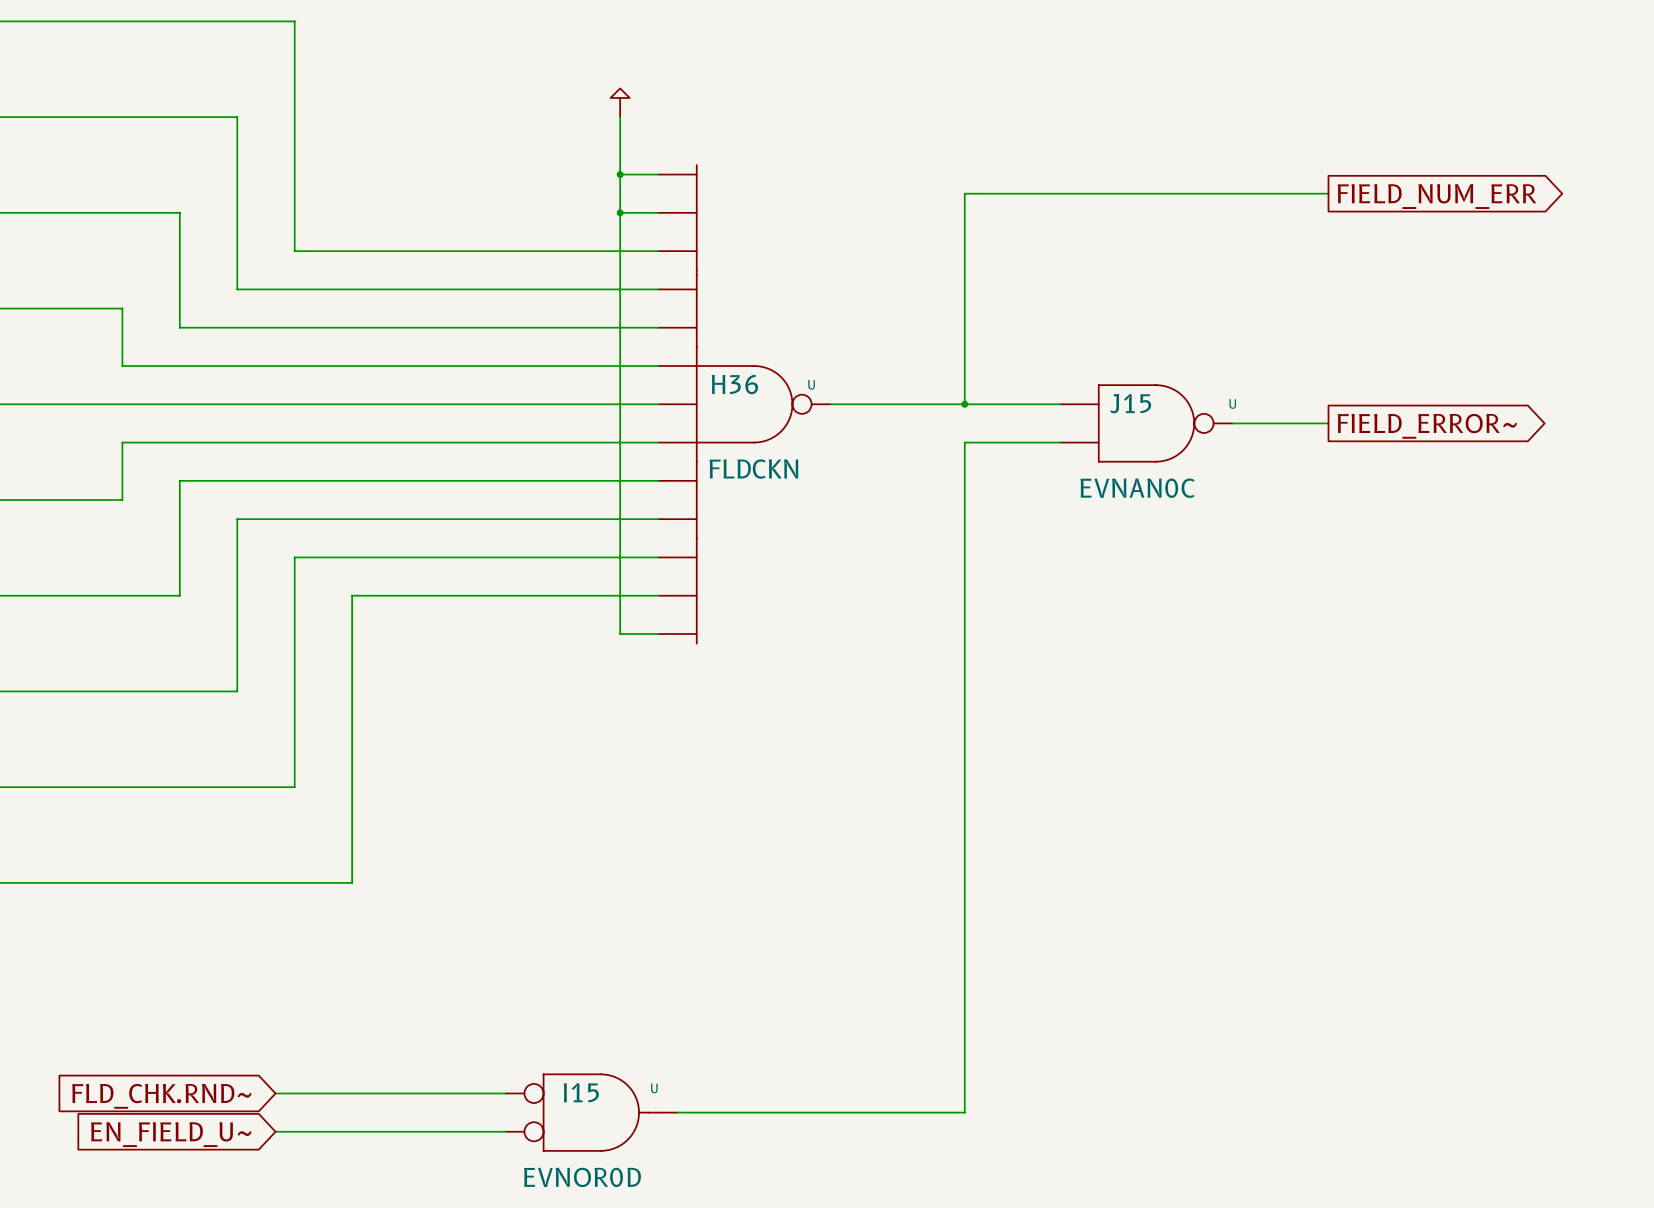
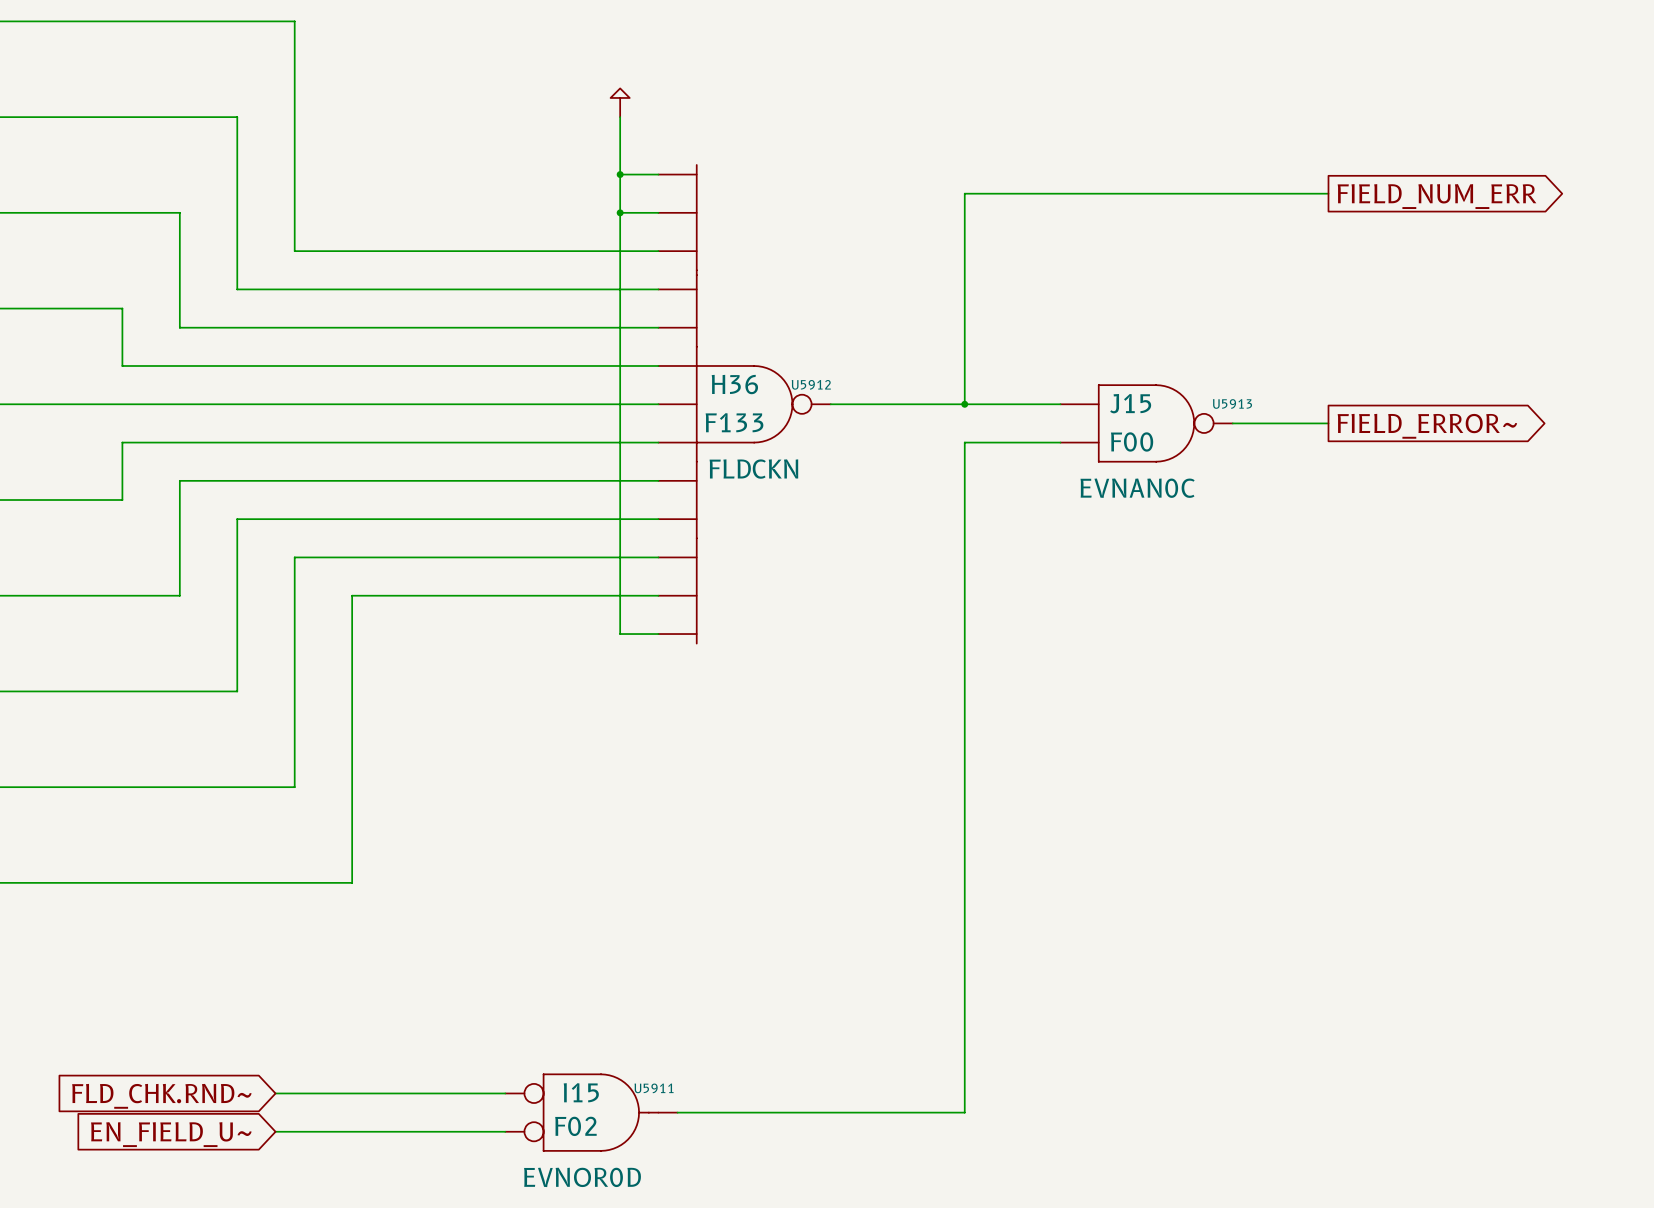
U name: U (811, 384) -> U5912 (811, 384)
U name: U (1232, 403) -> U5913 (1232, 403)
U value: none -> F133 (734, 422)
U value: none -> F00 (1132, 441)
U name: U (654, 1088) -> U5911 (654, 1088)
U value: none -> F02 (575, 1126)

